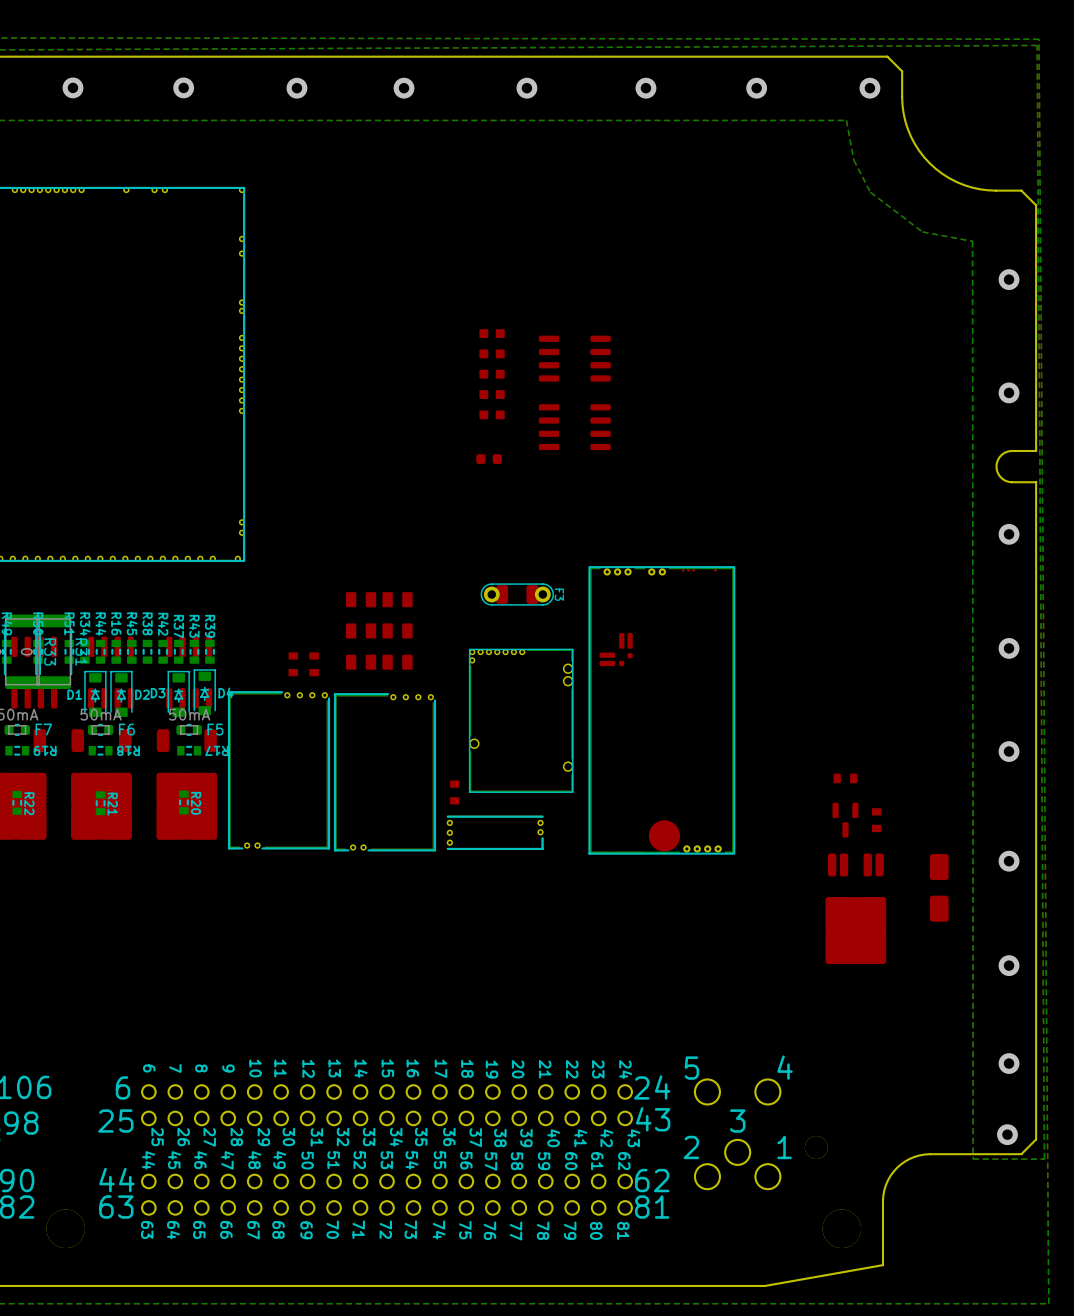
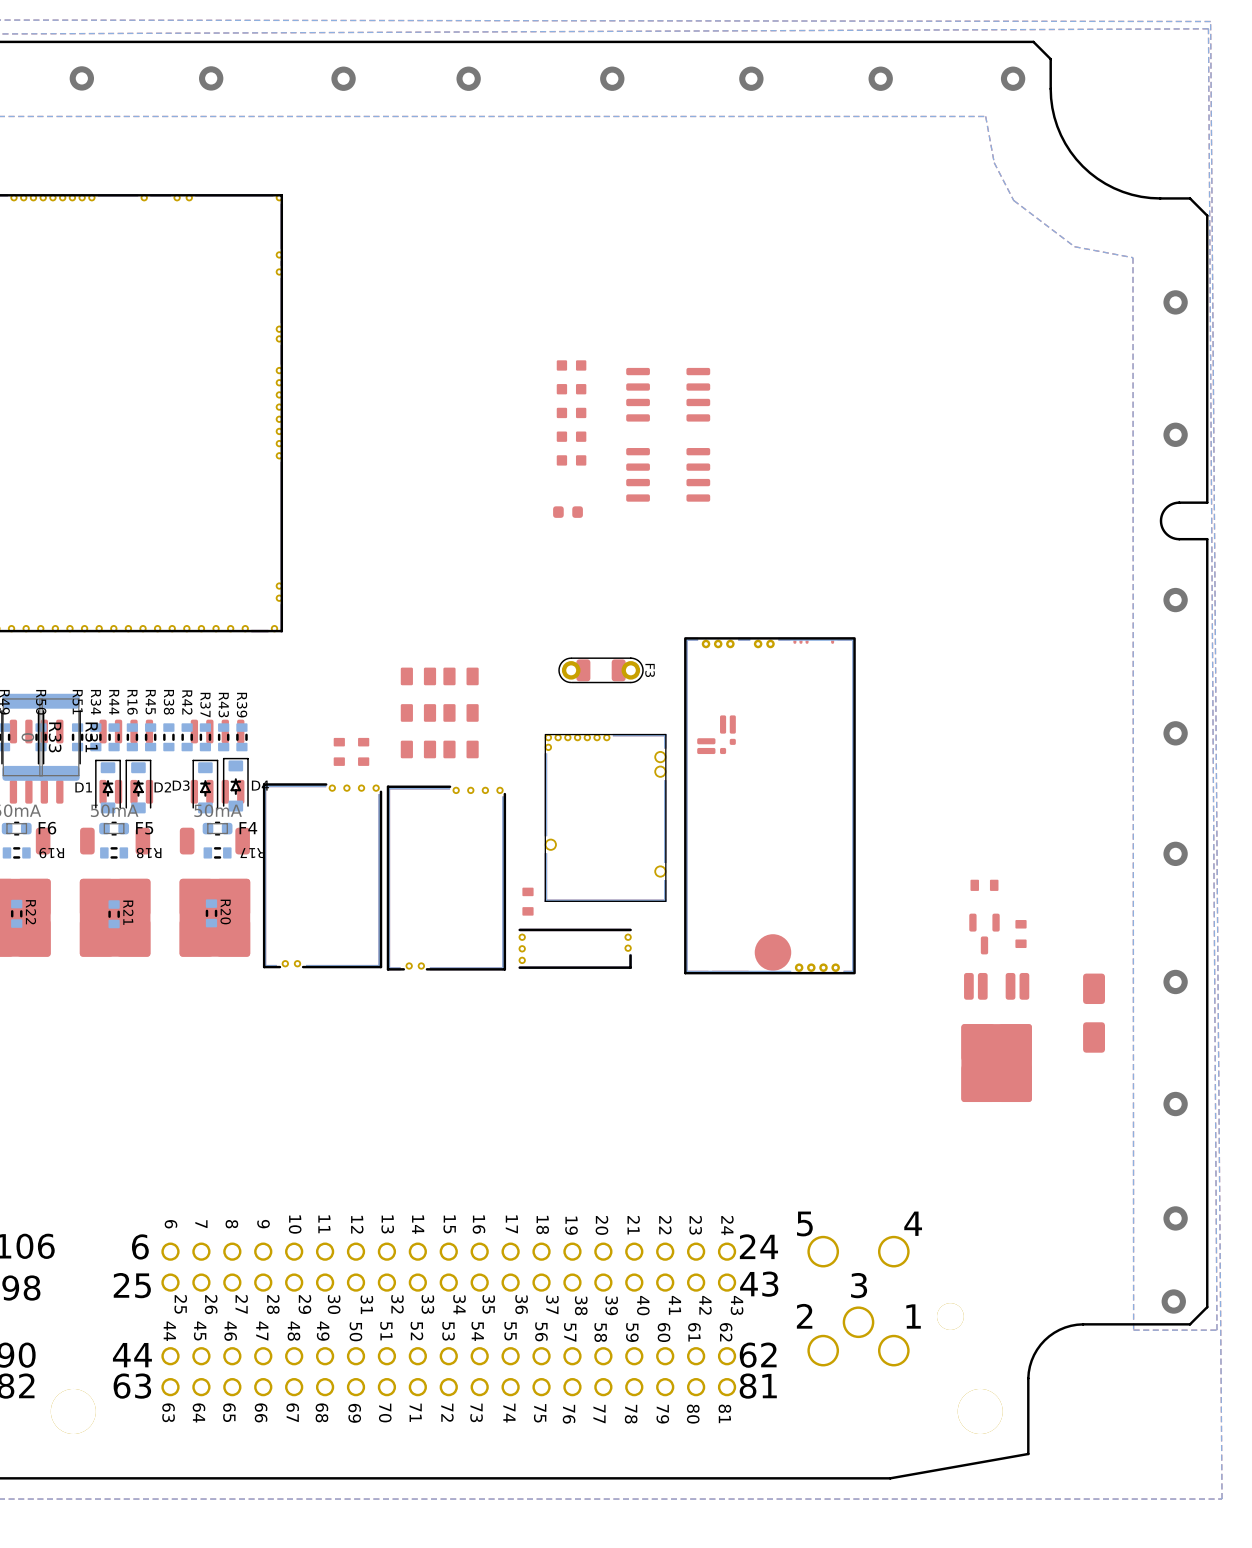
F7 name: F7 (43, 729) -> F6 (47, 828)
F6 name: F6 (126, 729) -> F5 (144, 828)
F5 name: F5 (215, 729) -> F4 (248, 828)

